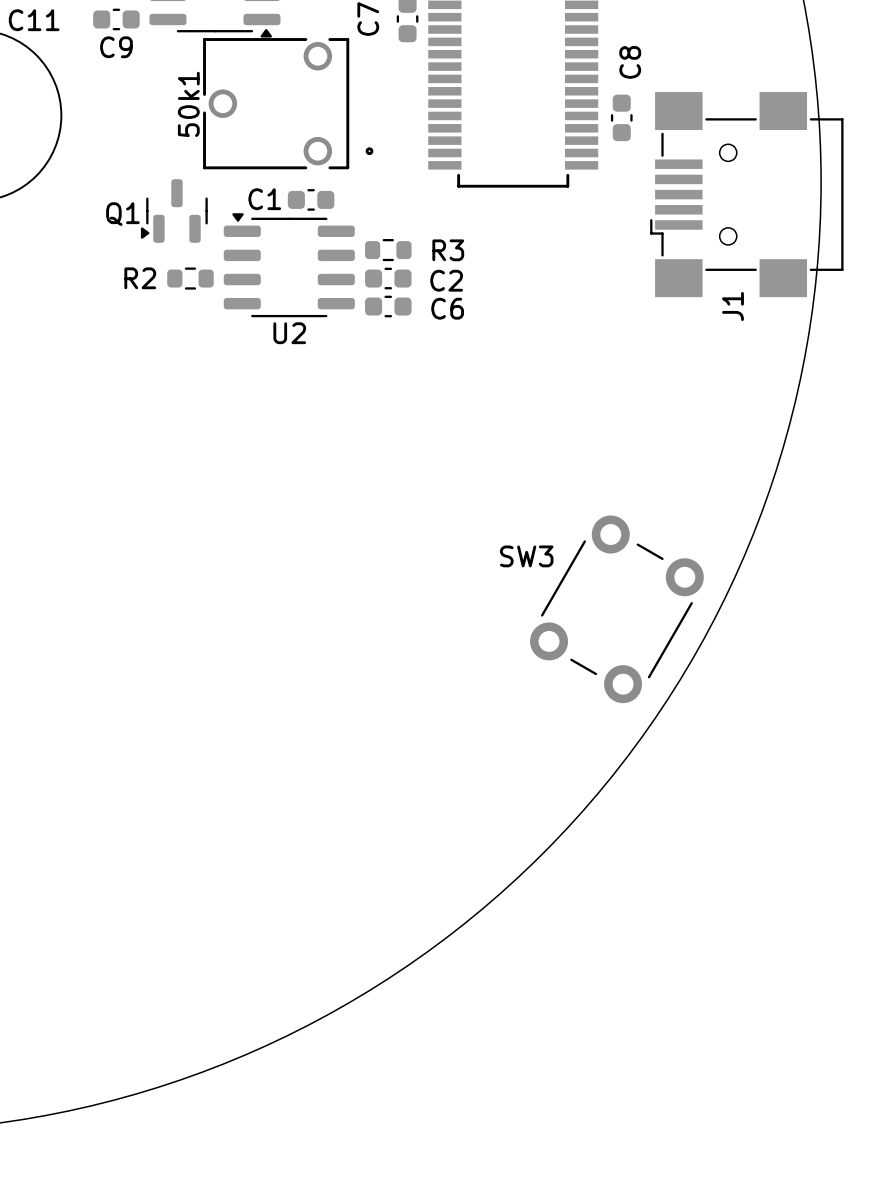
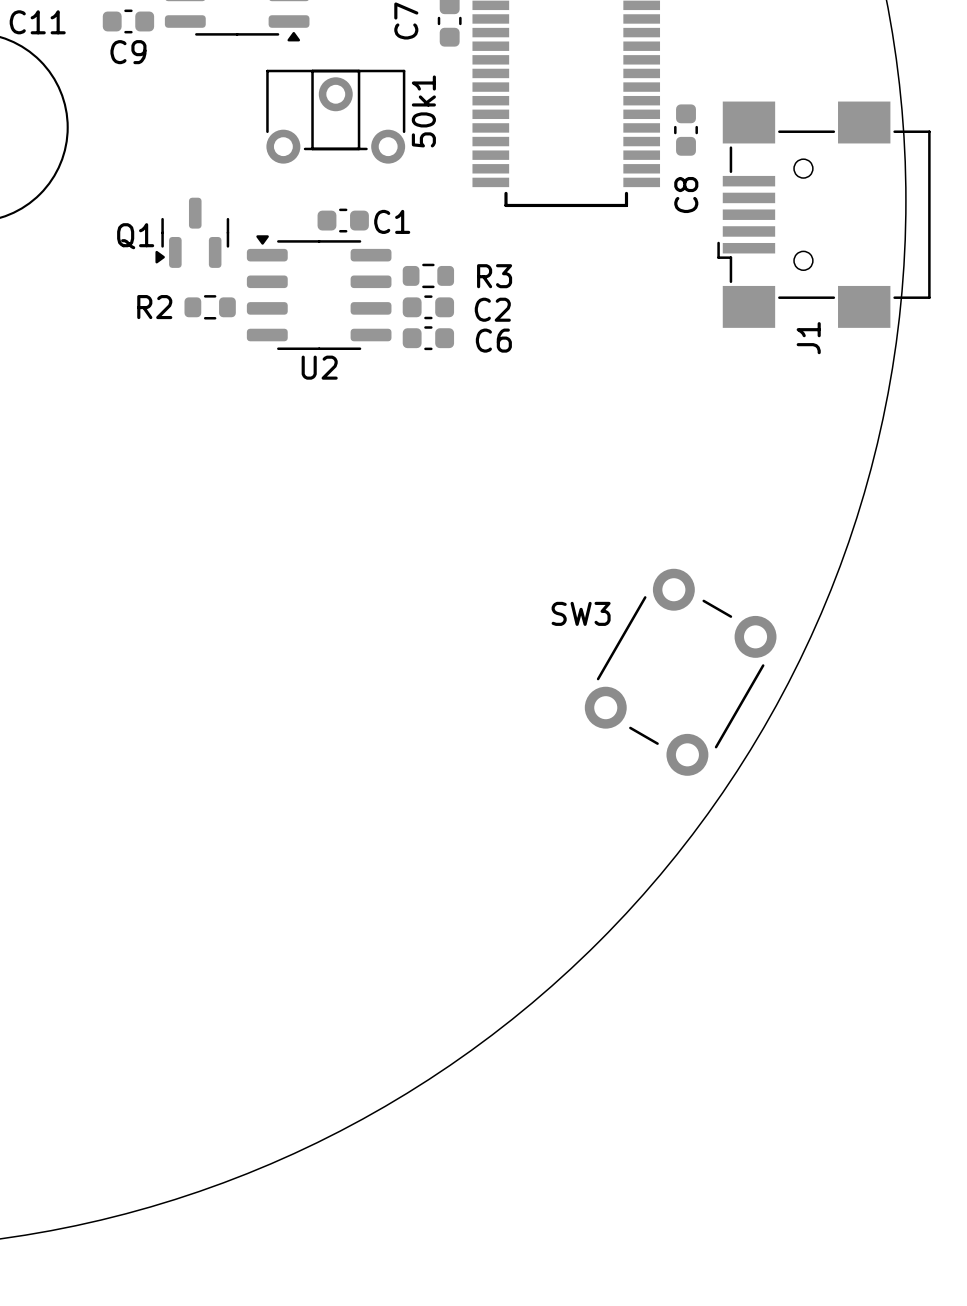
50k1 footprint: [203, 38, 374, 170] -> [266, 69, 406, 164]
C8 name position: C8 (630, 62) -> C8 (686, 195)
50k1 name position: 50k1 (188, 104) -> 50k1 (423, 111)
C1 name position: C1 (264, 199) -> C1 (392, 221)

